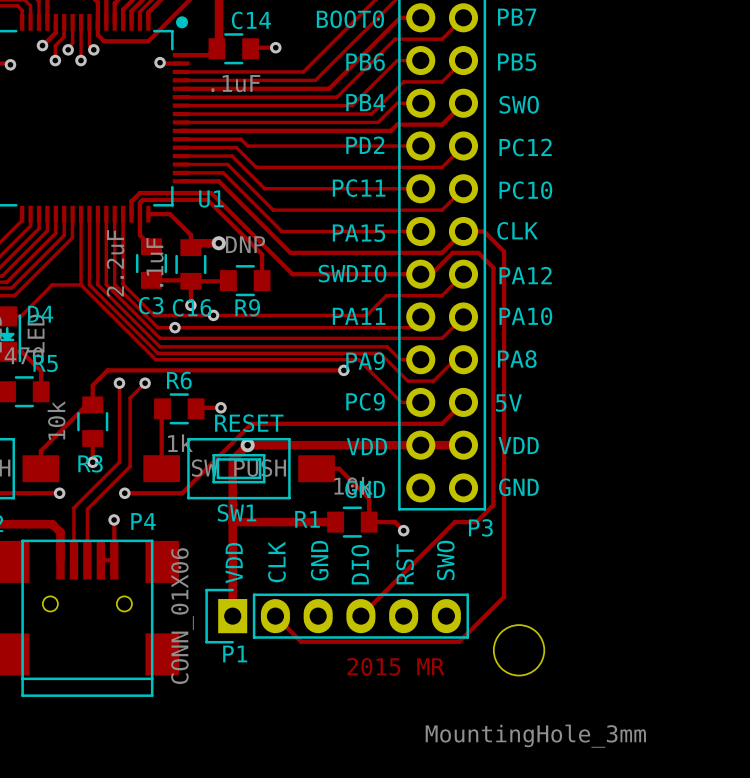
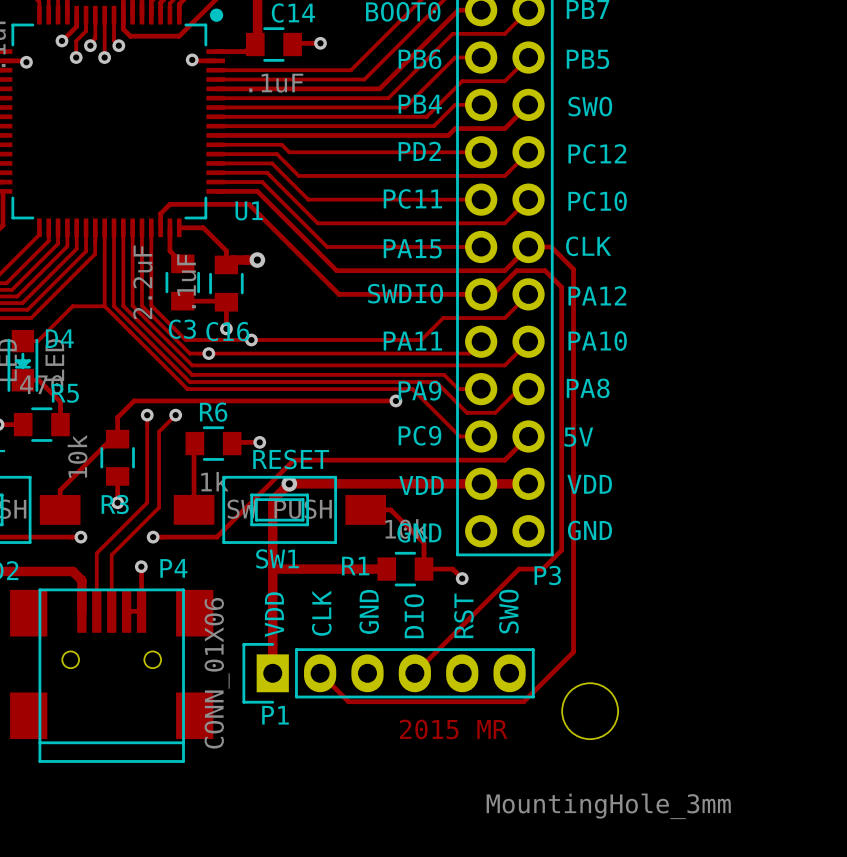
track: (139, 214) (139, 202) (142, 199) (207, 199) (262, 254) (262, 280) -> none
track: (228, 280) (190, 281) -> none
R9: DNP (245, 280) -> none

